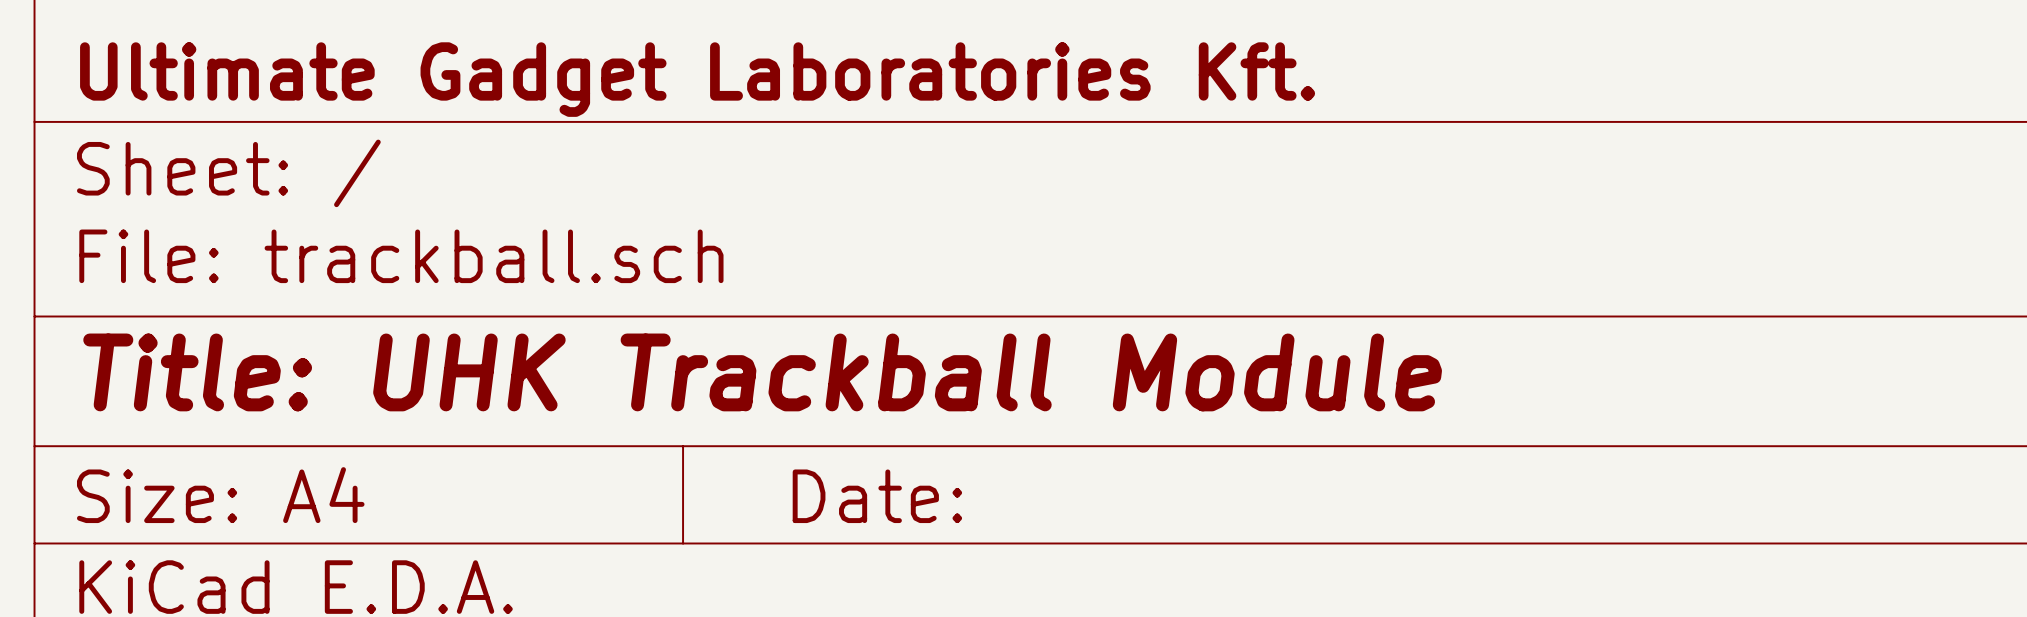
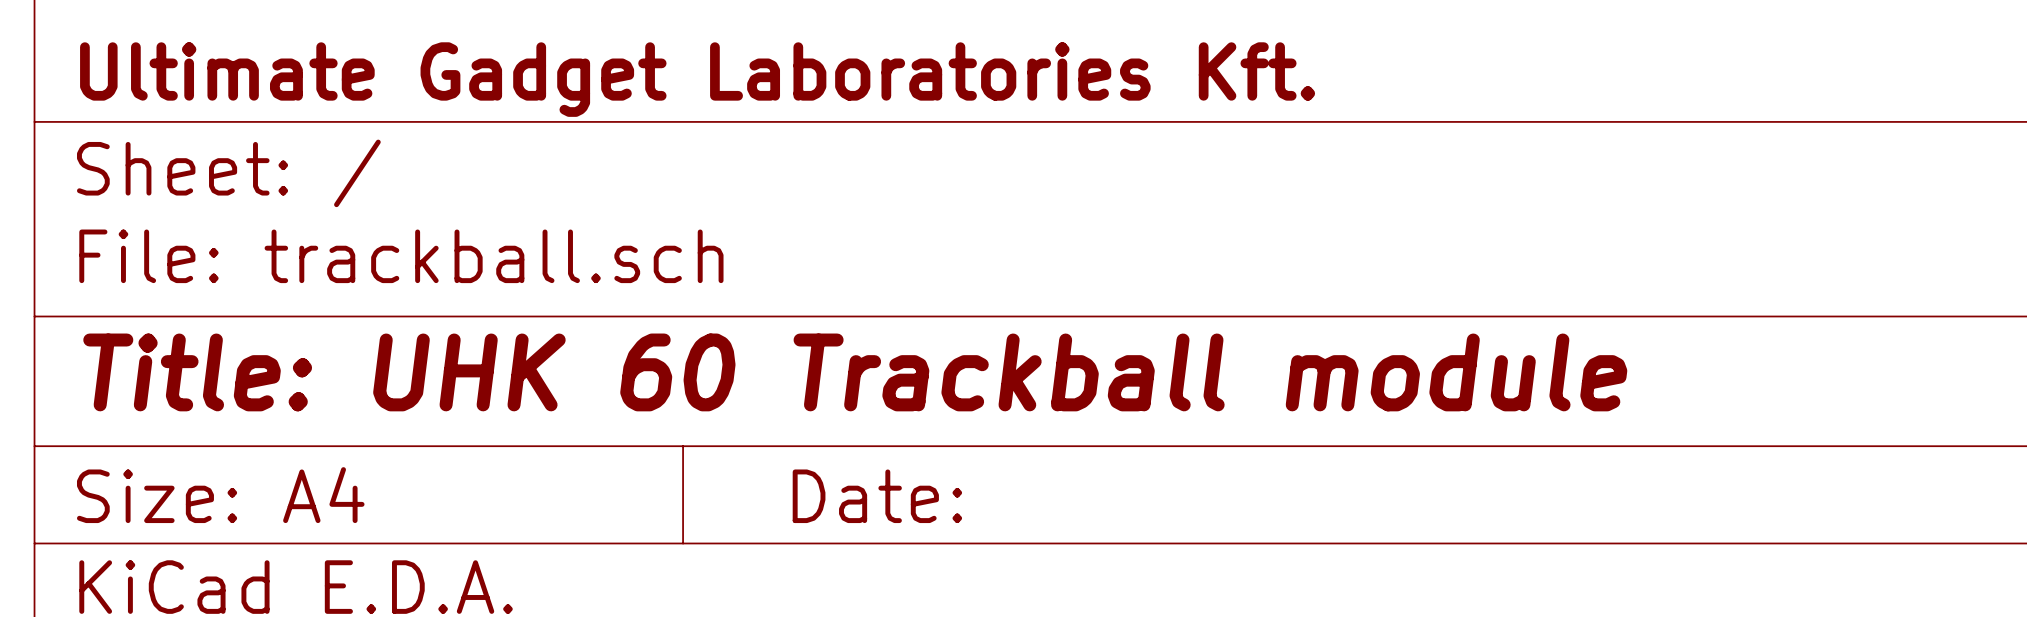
title block: Title: UHK Trackball Module (762, 372) -> Title: UHK 60 Trackball module (855, 372)

